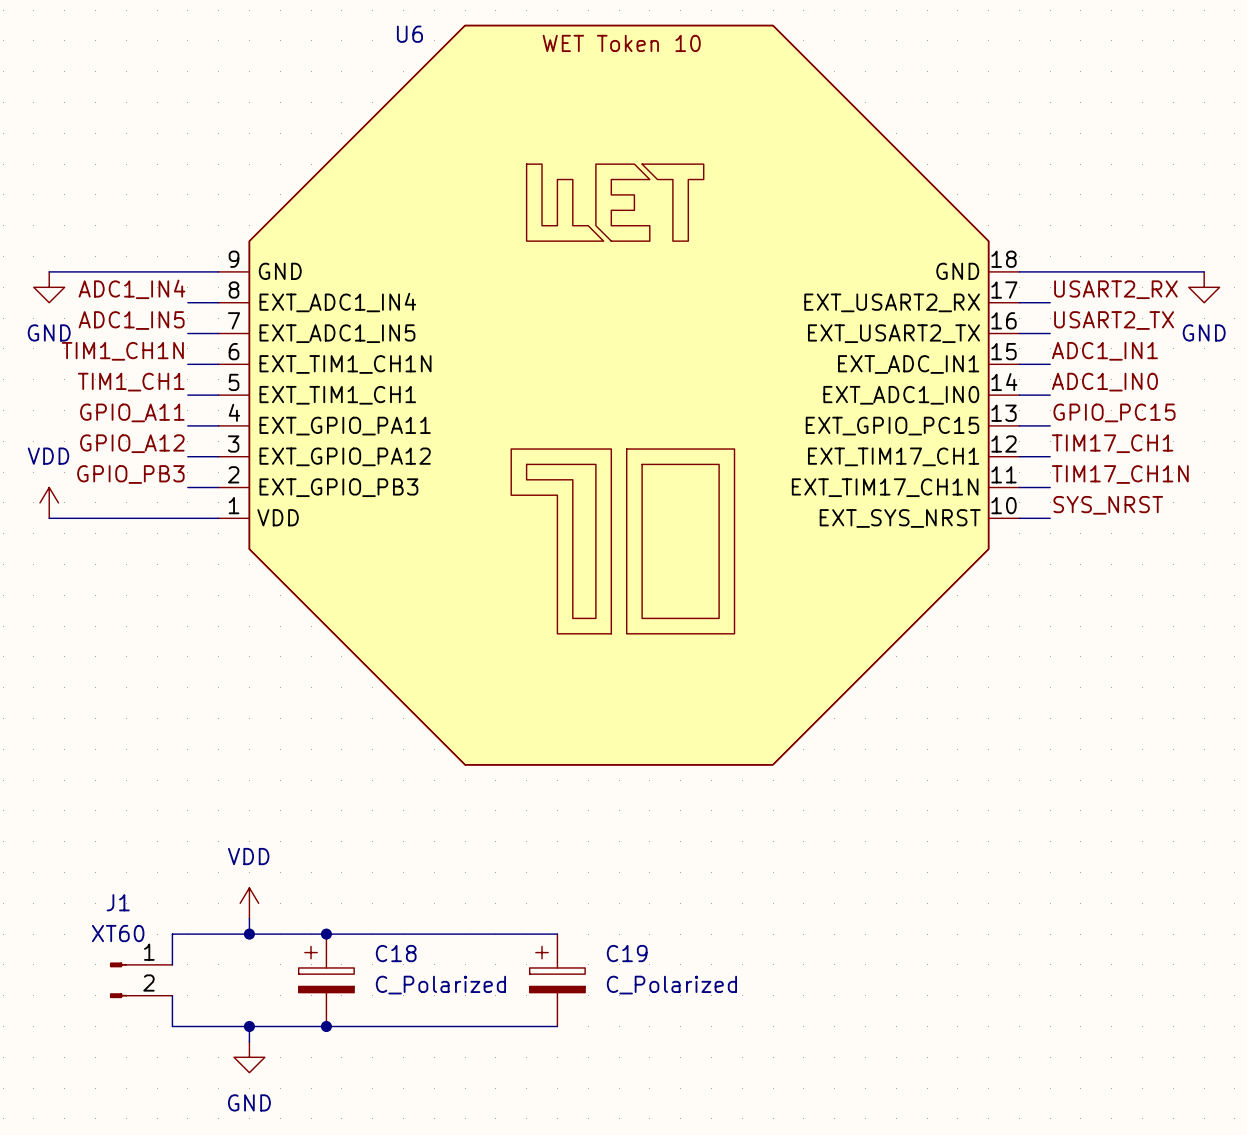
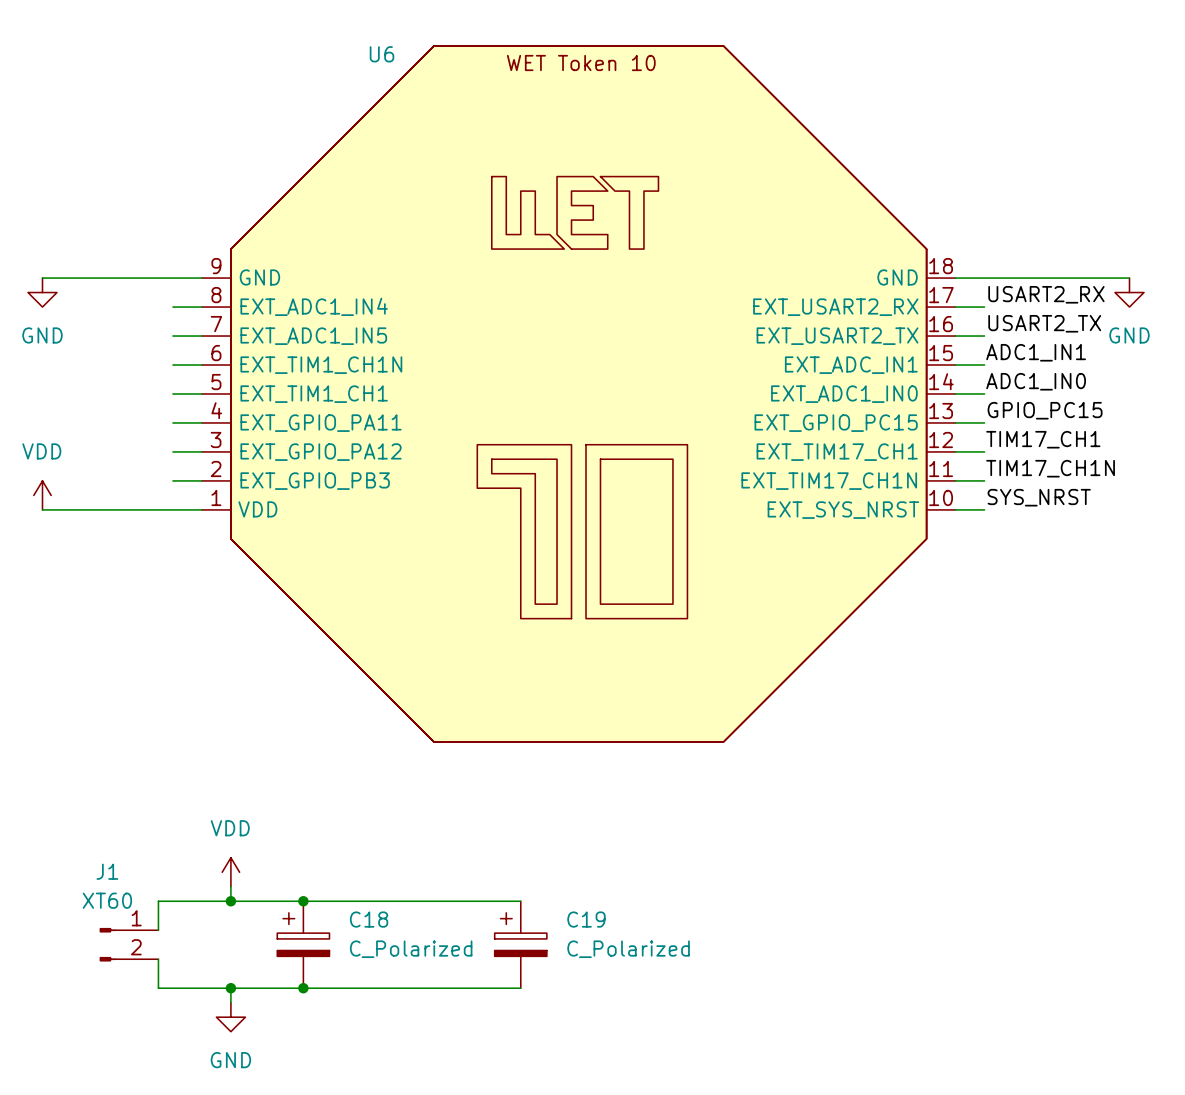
label: ADC1_IN4 (131, 289) -> none
label: ADC1_IN5 (131, 320) -> none
label: TIM1_CH1N (122, 351) -> none
label: TIM1_CH1 (131, 382) -> none
label: GPIO_A11 (132, 412) -> none
label: GPIO_A12 (132, 443) -> none
label: GPIO_PB3 (130, 474) -> none

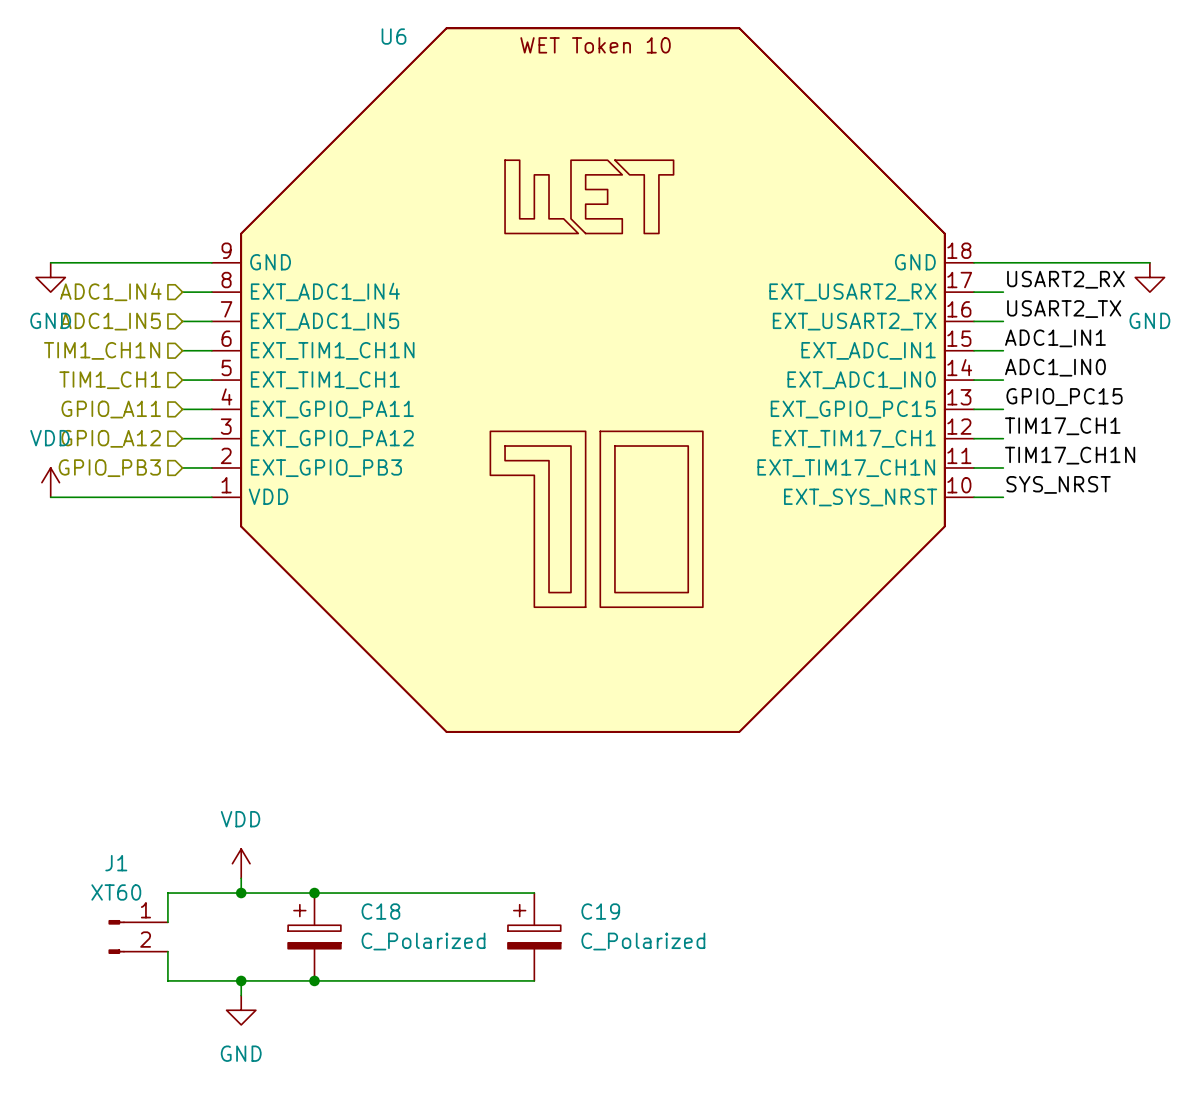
hierarchical label: none -> ADC1_IN4 (110, 291)
hierarchical label: none -> ADC1_IN5 (110, 321)
hierarchical label: none -> TIM1_CH1N (102, 350)
hierarchical label: none -> TIM1_CH1 (110, 380)
hierarchical label: none -> GPIO_A11 (111, 409)
hierarchical label: none -> GPIO_A12 (111, 438)
hierarchical label: none -> GPIO_PB3 (109, 468)

